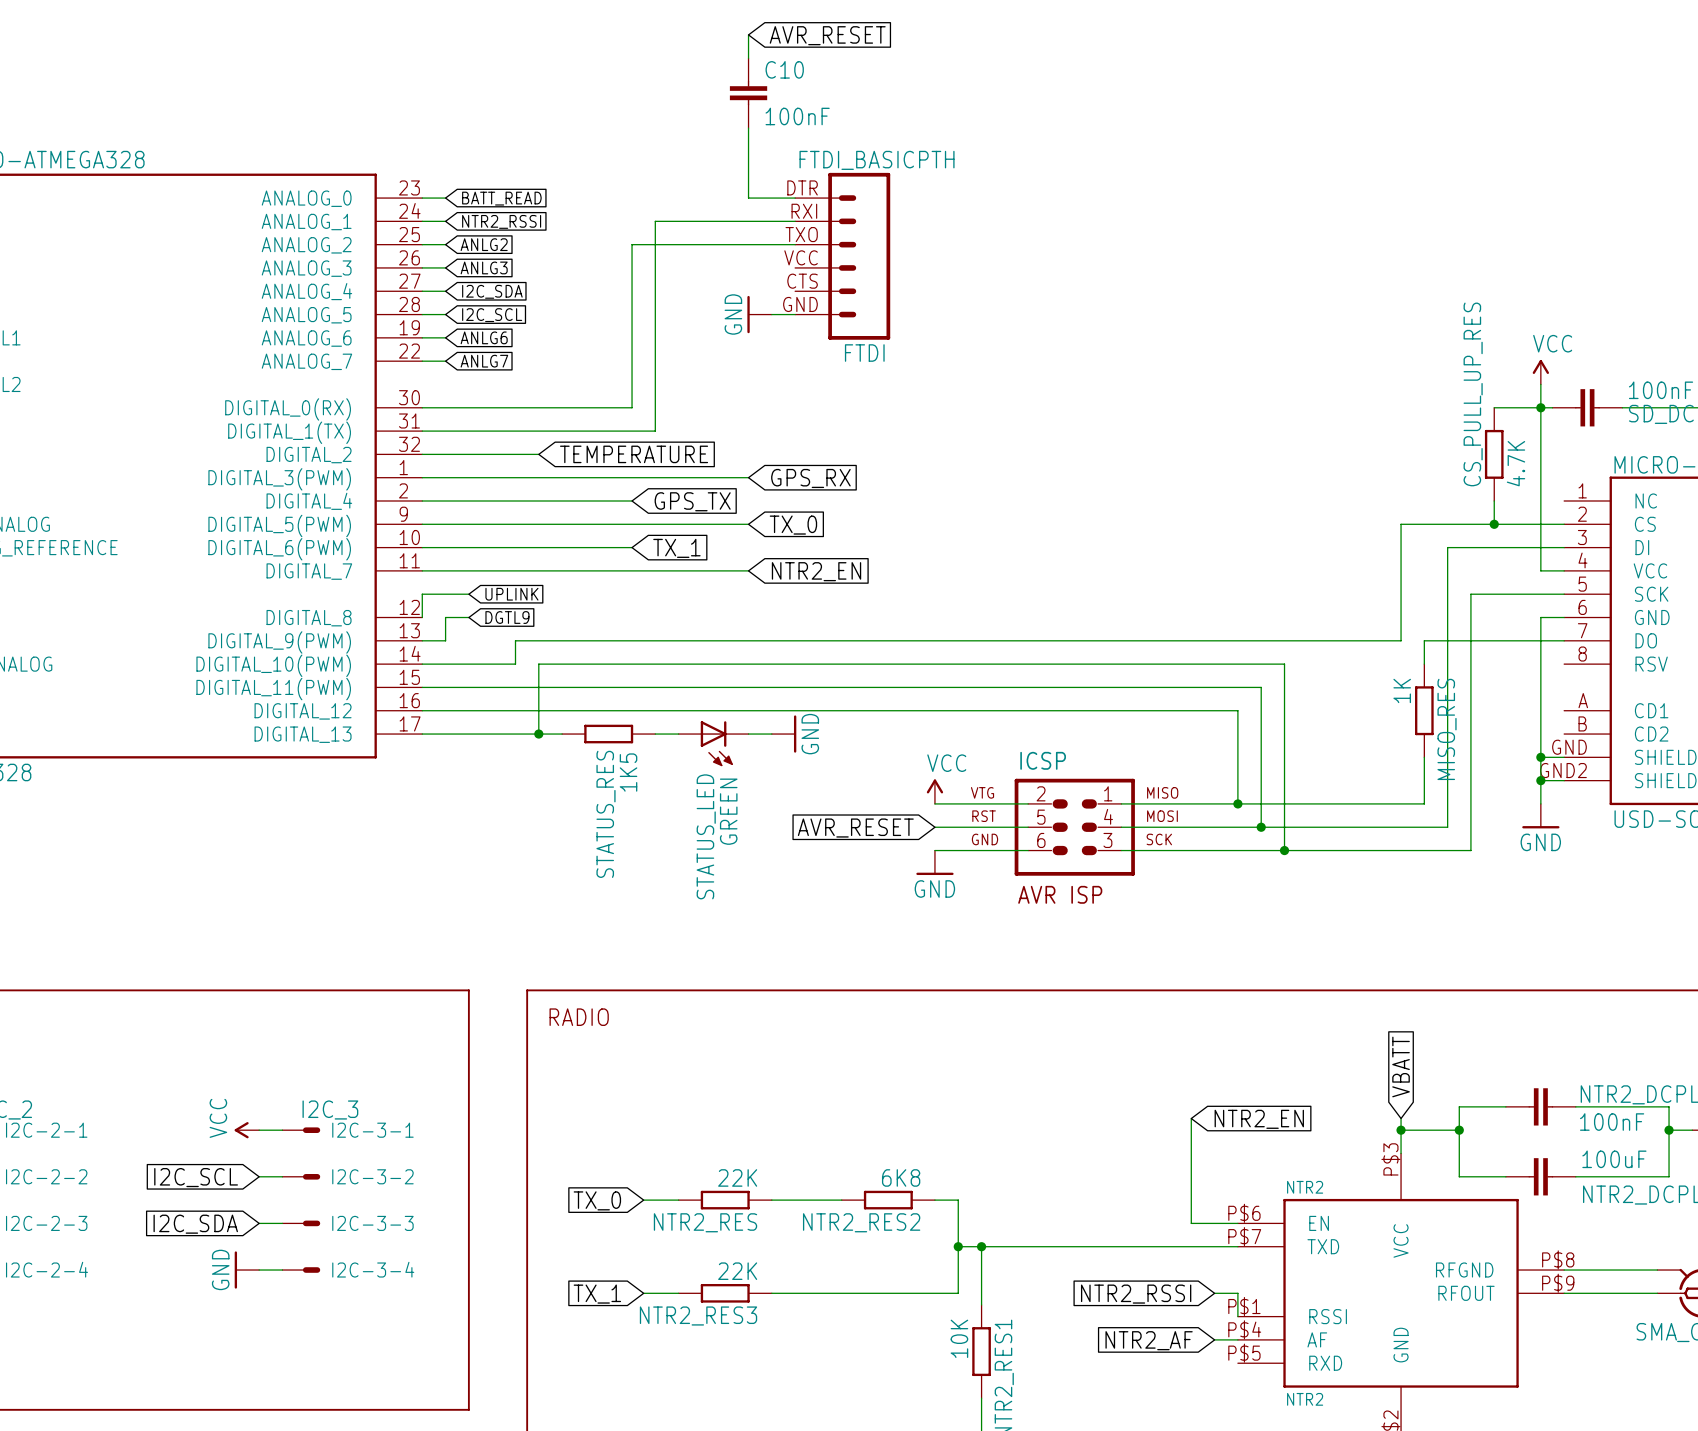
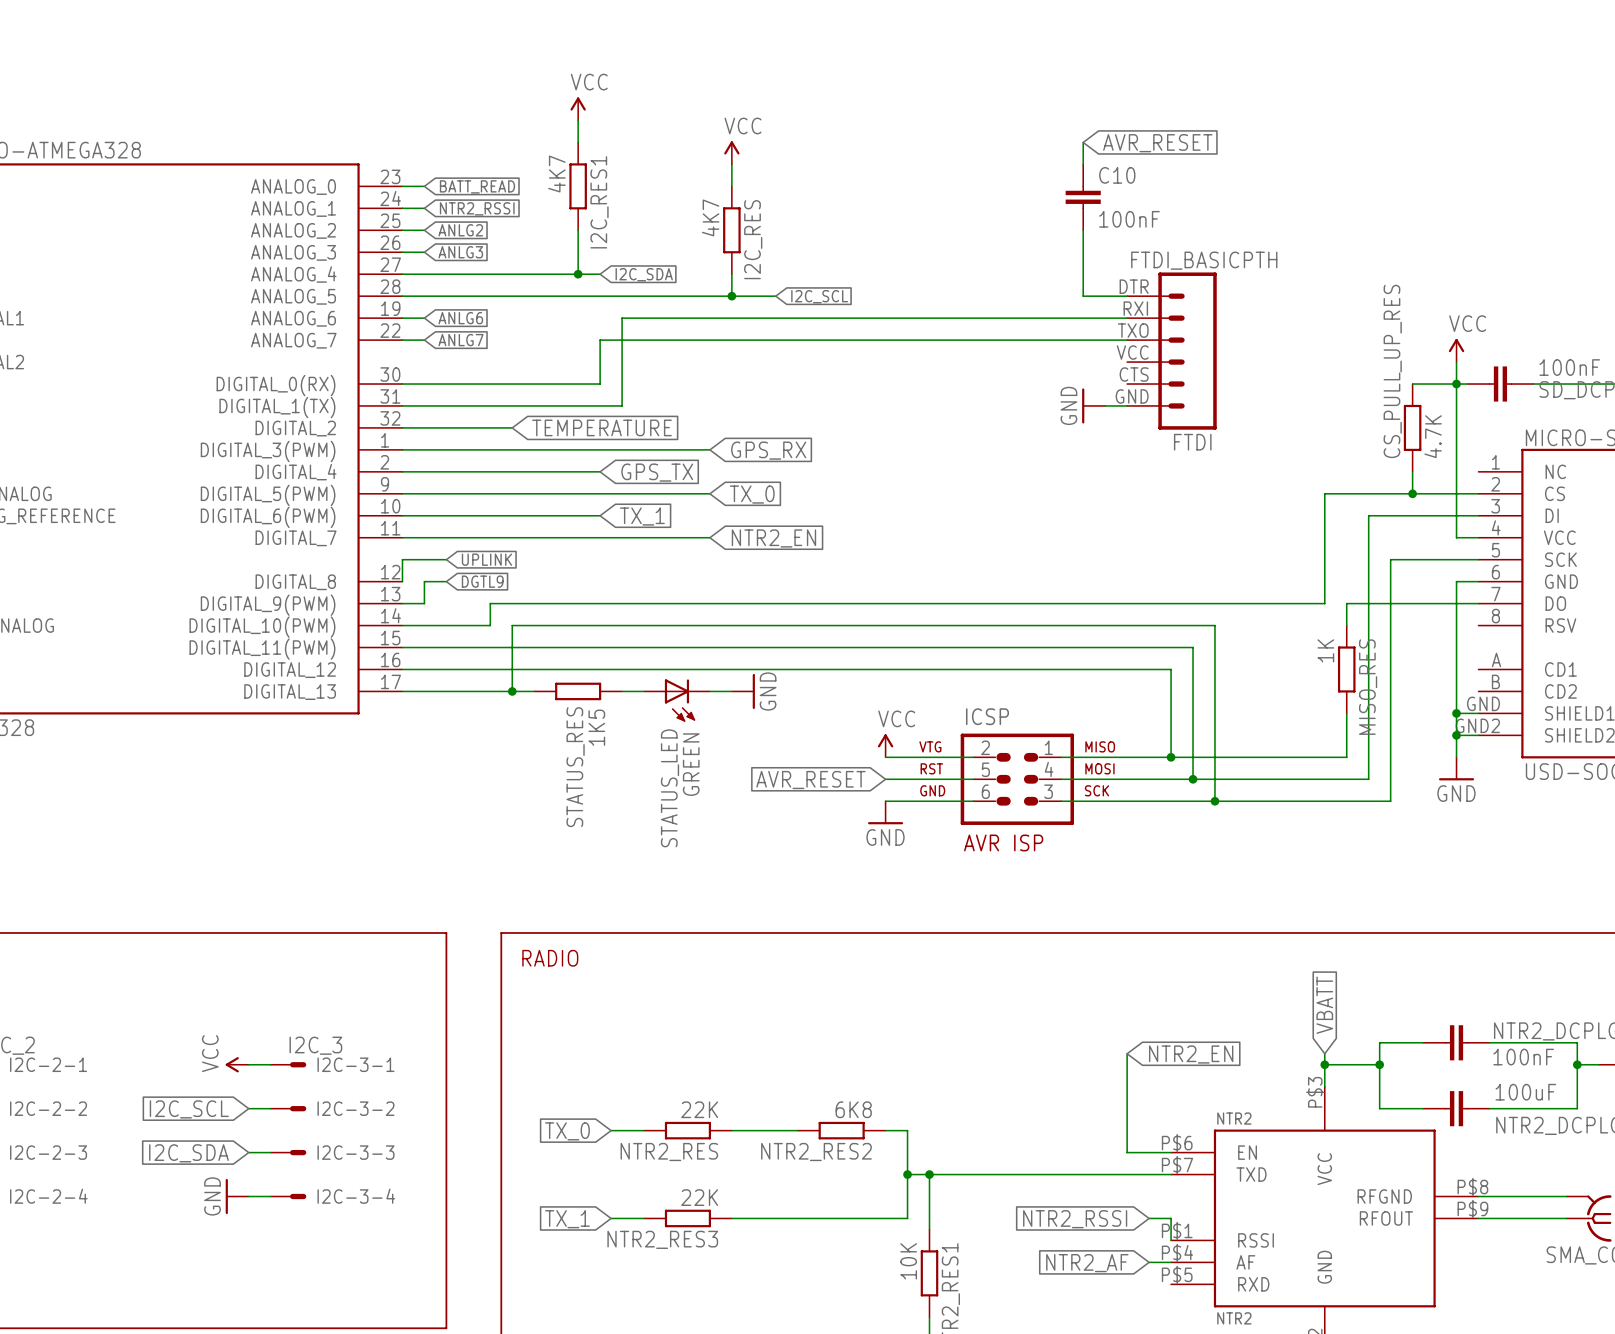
wire: (748, 34) (748, 58) -> (731, 164) (731, 186)
global label: AVR_RESET (827, 35) -> none
C10 position: (748, 93) -> (1083, 197)
power symbol: none -> VCC (578, 108)
wire: none -> (578, 120) (578, 142)
wire: (748, 128) (748, 198) (795, 198) -> none
wire: none -> (1083, 142) (1083, 164)
global label: none -> AVR_RESET (1157, 143)
power symbol: none -> VCC (731, 152)
I2C_RES1: none -> 4K7 (578, 186)
wire: (795, 221) (655, 221) (655, 337) -> (1127, 318) (622, 318)
wire: none -> (578, 230) (578, 274)
I2C_RES: none -> 4K7 (731, 230)
wire: (795, 244) (632, 244) (632, 361) -> (1127, 340) (600, 340)
wire: none -> (1083, 230) (1083, 296) (1127, 296)
FTDI: FTDI_BASICPTH (842, 256) -> none
wire: none -> (424, 274) (600, 274)
global label position: I2C_SDA (492, 291) -> I2C_SDA (644, 274)
junction: none -> (578, 274)
wire: none -> (731, 274) (731, 296) (424, 296)
power symbol: GND (759, 314) -> none
junction: none -> (731, 296)
global label: I2C_SCL (492, 315) -> none
global label: none -> I2C_SCL (819, 296)
FTDI: none -> FTDI_BASICPTH (1171, 351)
power symbol: none -> GND (1093, 405)
wire: none -> (1105, 405) (1127, 405)

